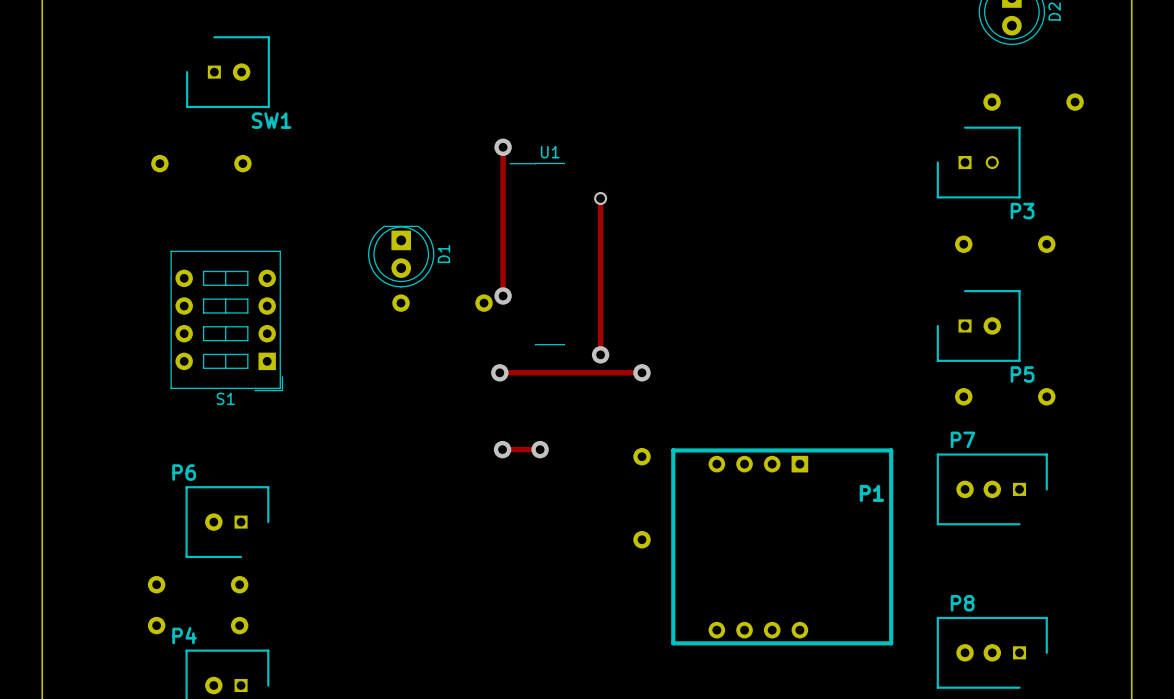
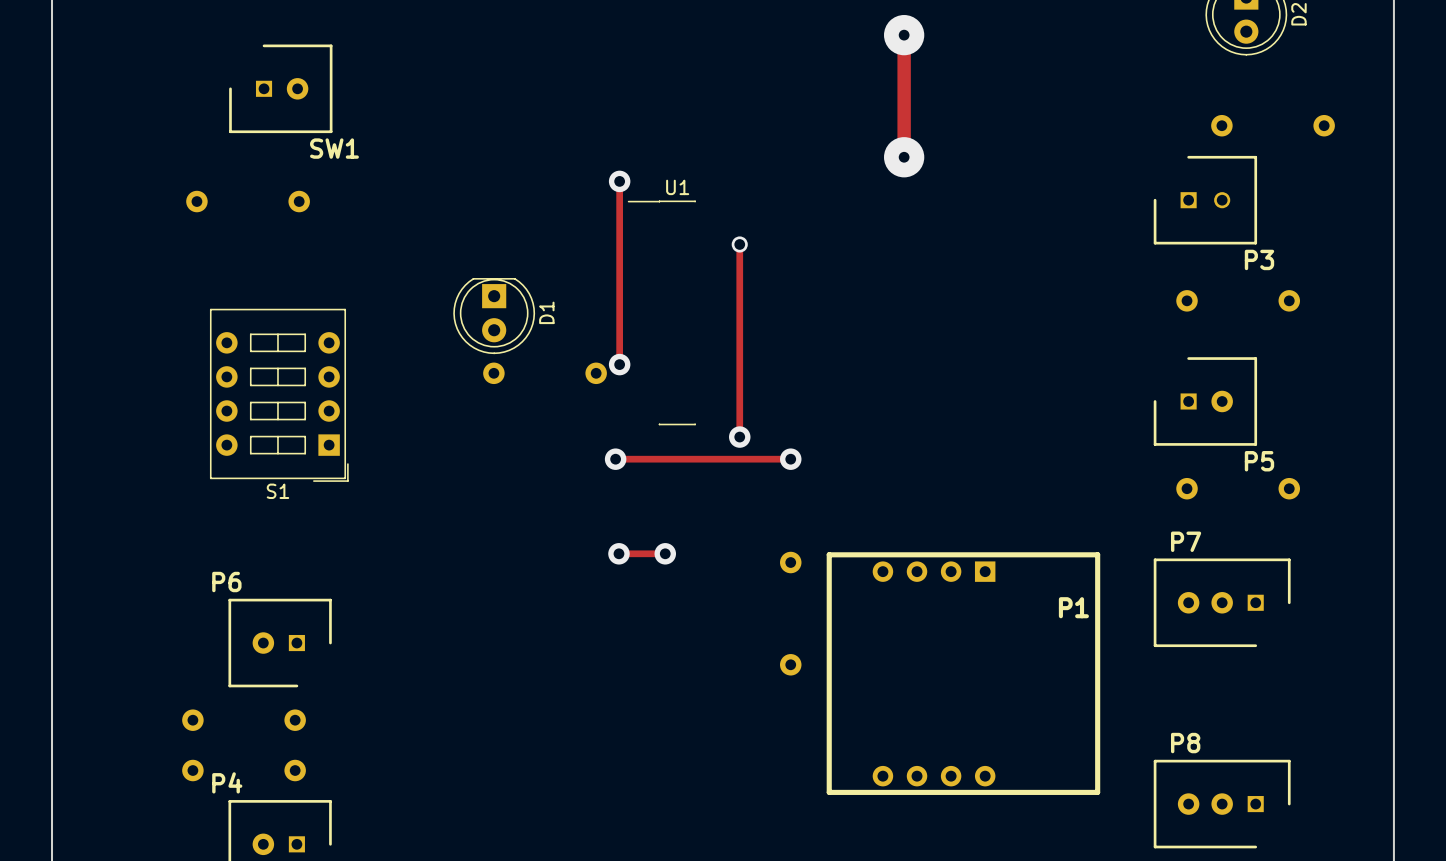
track: none -> (904, 35) (904, 157)
via: none -> (904, 35)
via: none -> (904, 157)

